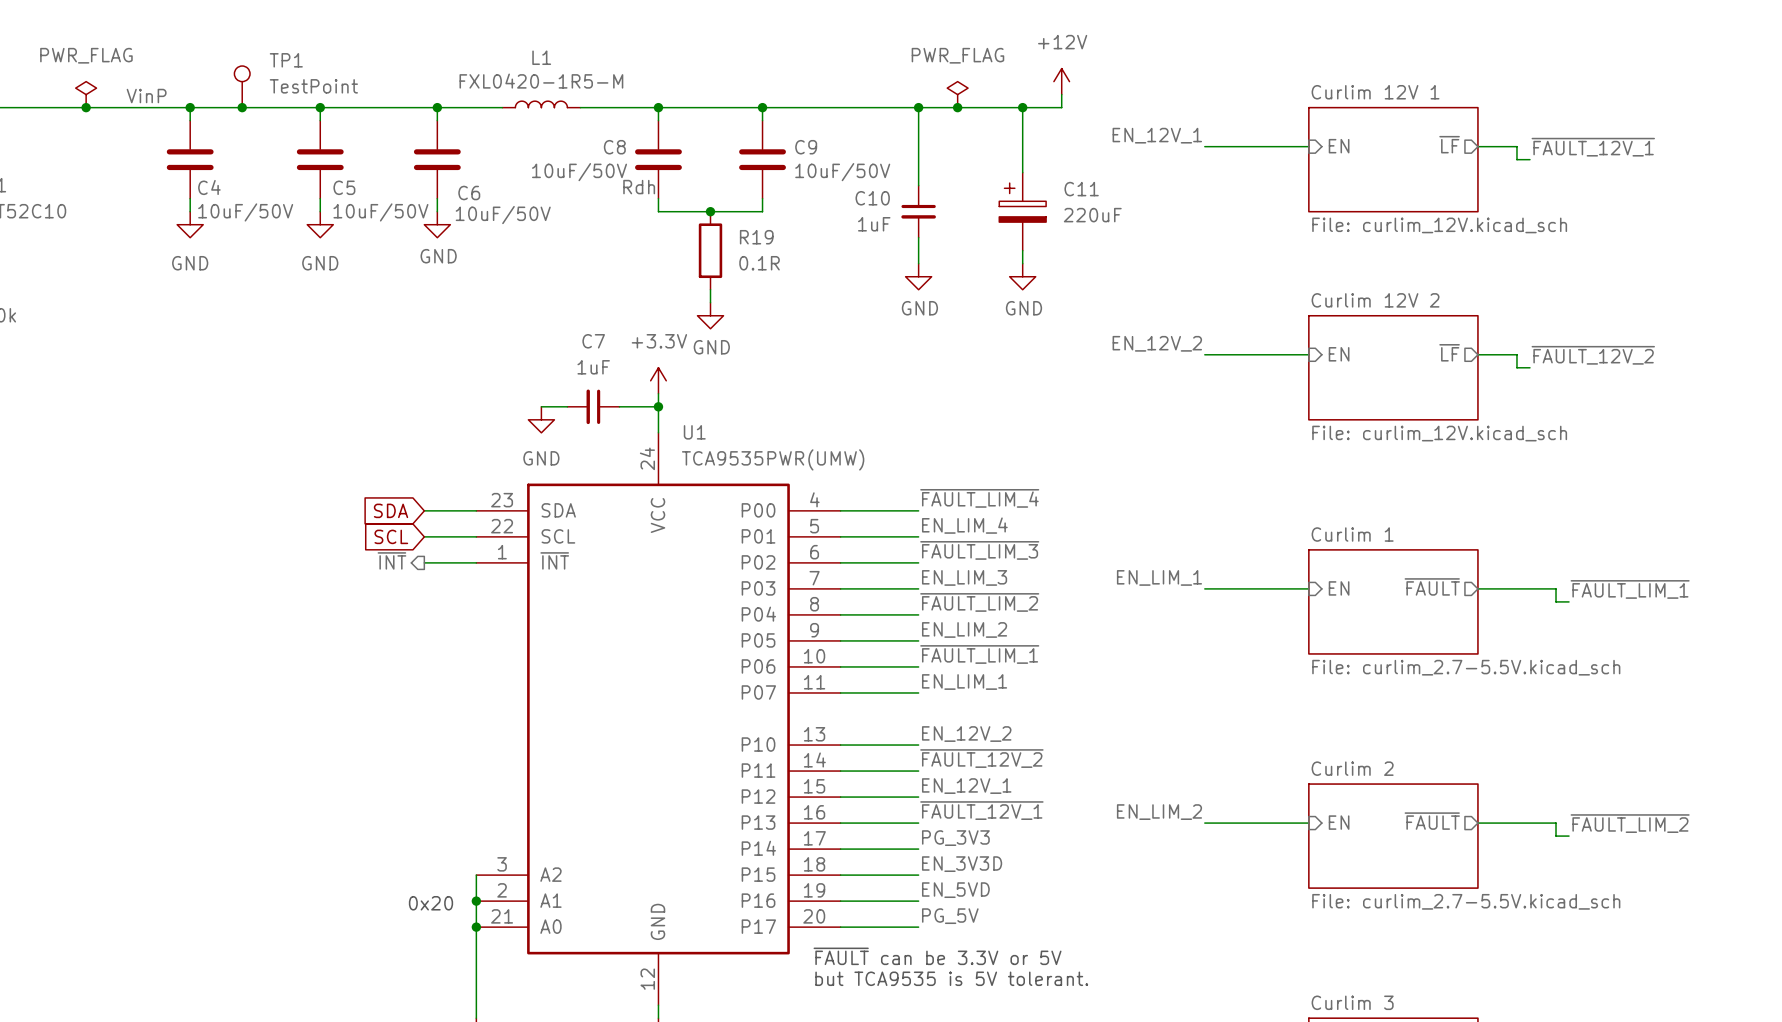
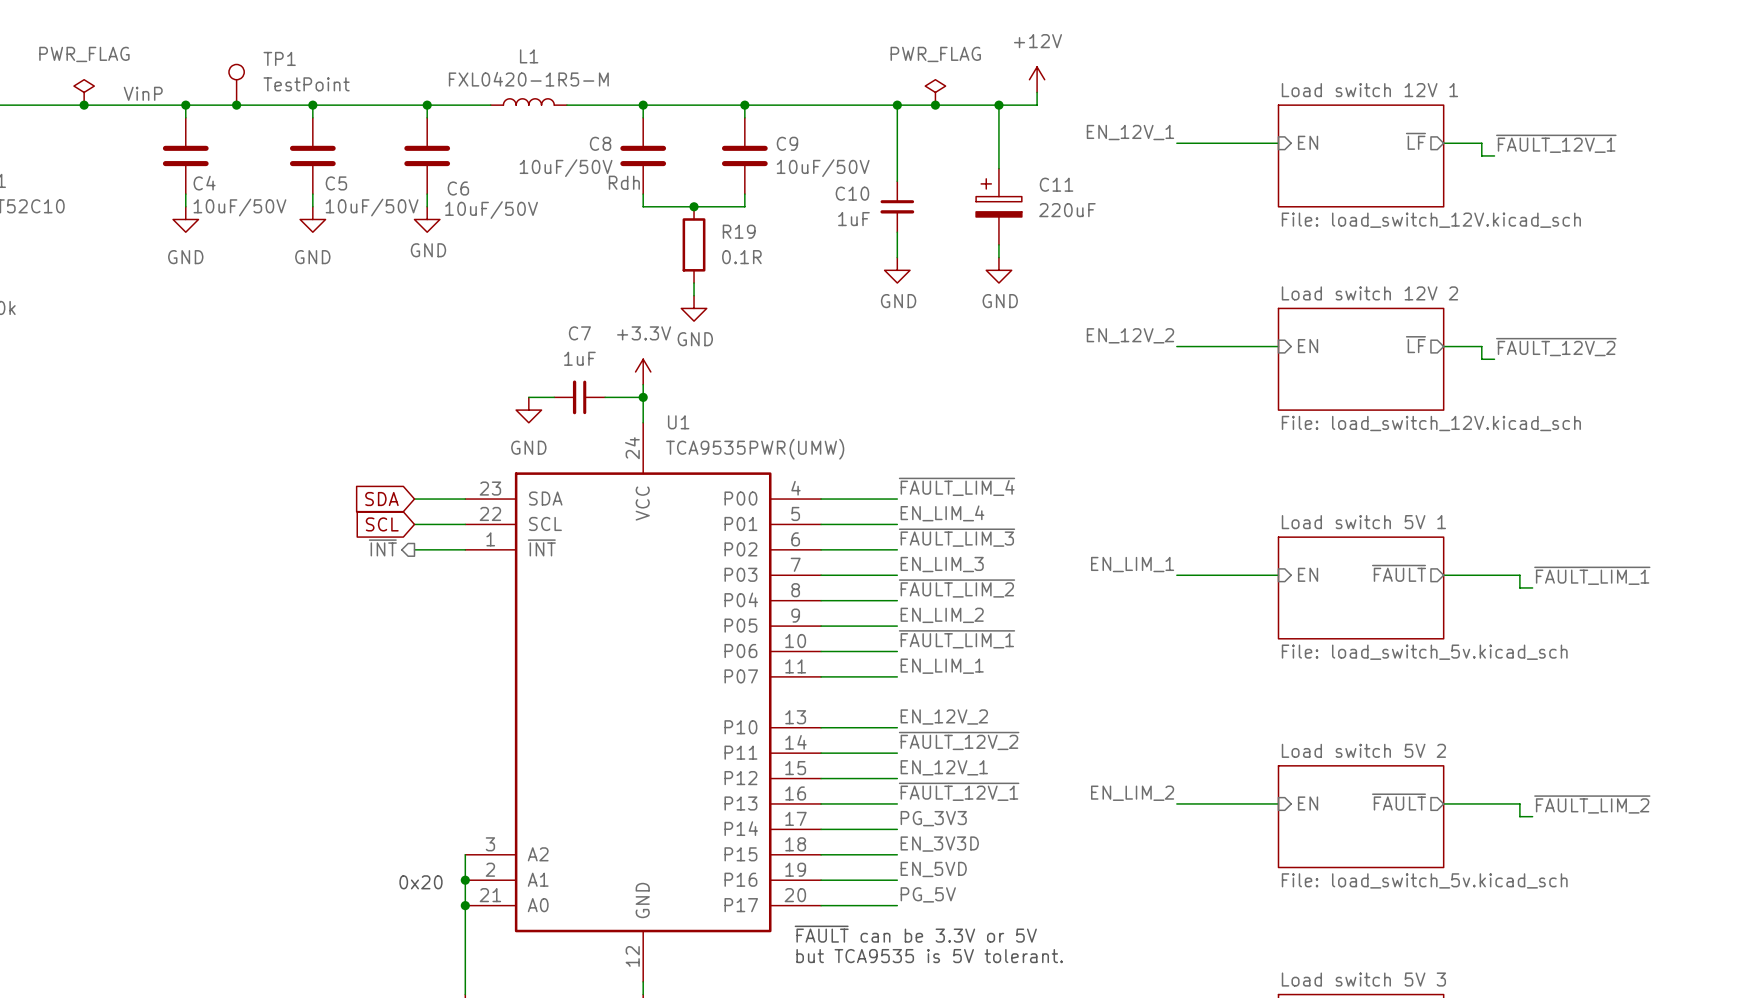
sheet Curlim 12V 1 name: Curlim 12V 1 (1375, 92) -> Load switch 12V 1 (1369, 90)
sheet Curlim 12V 1 value: File: curlim_12V.kicad_sch (1439, 225) -> File: load_switch_12V.kicad_sch (1431, 220)
sheet Curlim 12V 2 name: Curlim 12V 2 (1375, 300) -> Load switch 12V 2 (1369, 293)
sheet Curlim 12V 2 value: File: curlim_12V.kicad_sch (1439, 433) -> File: load_switch_12V.kicad_sch (1431, 423)
sheet Curlim 1 name: Curlim 1 (1352, 534) -> Load switch 5V 1 (1363, 522)
sheet Curlim 1 value: File: curlim_2.7-5.5V.kicad_sch (1466, 667) -> File: load_switch_5v.kicad_sch (1424, 652)
sheet Curlim 2 name: Curlim 2 (1352, 768) -> Load switch 5V 2 (1363, 750)
sheet Curlim 2 value: File: curlim_2.7-5.5V.kicad_sch (1466, 901) -> File: load_switch_5v.kicad_sch (1424, 880)
sheet Curlim 3 name: Curlim 3 (1352, 1002) -> Load switch 5V 3 (1363, 979)

